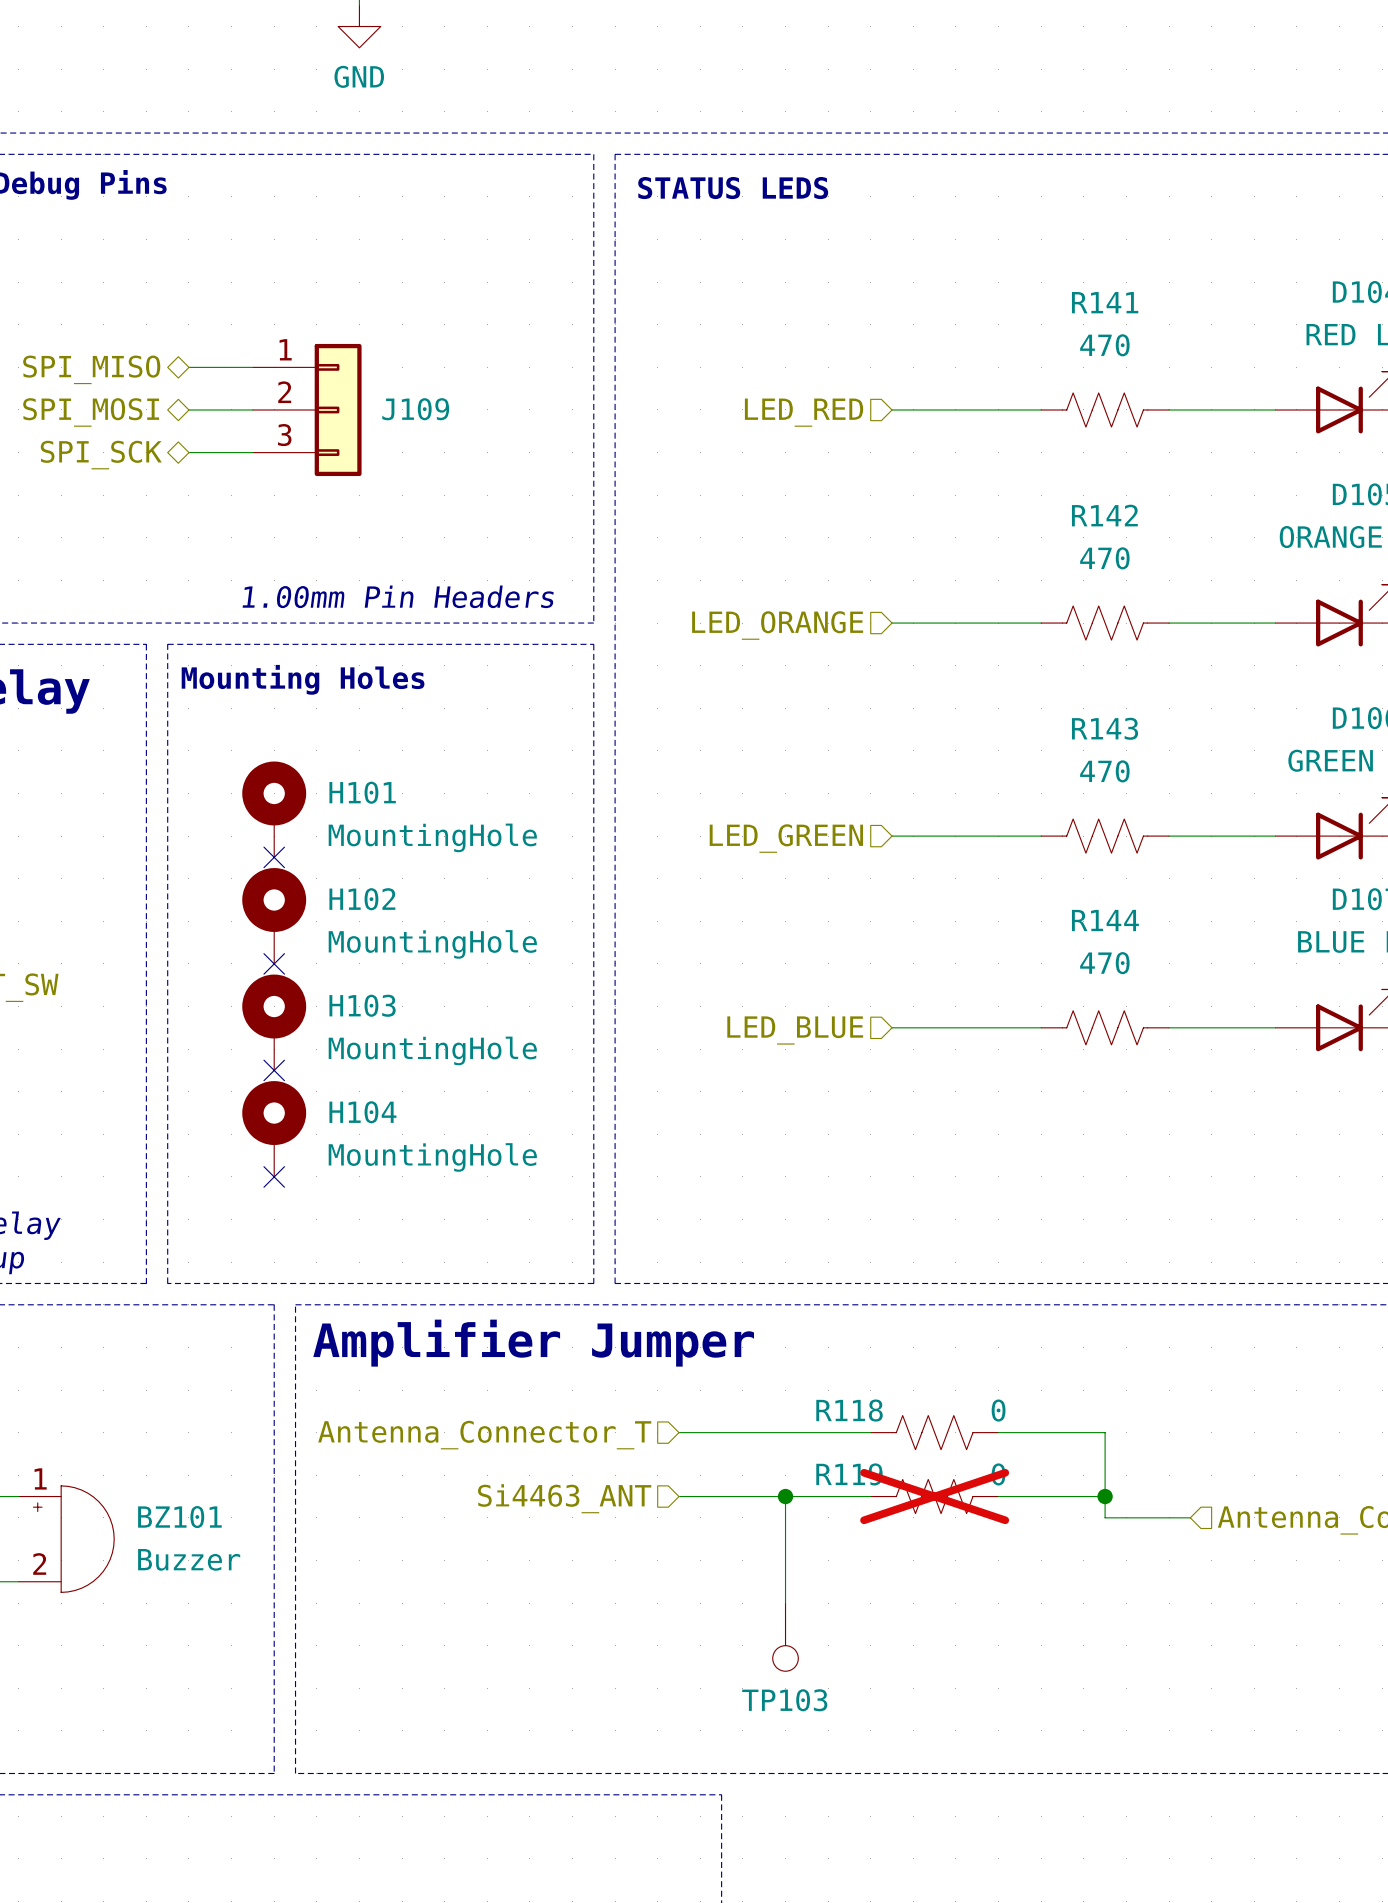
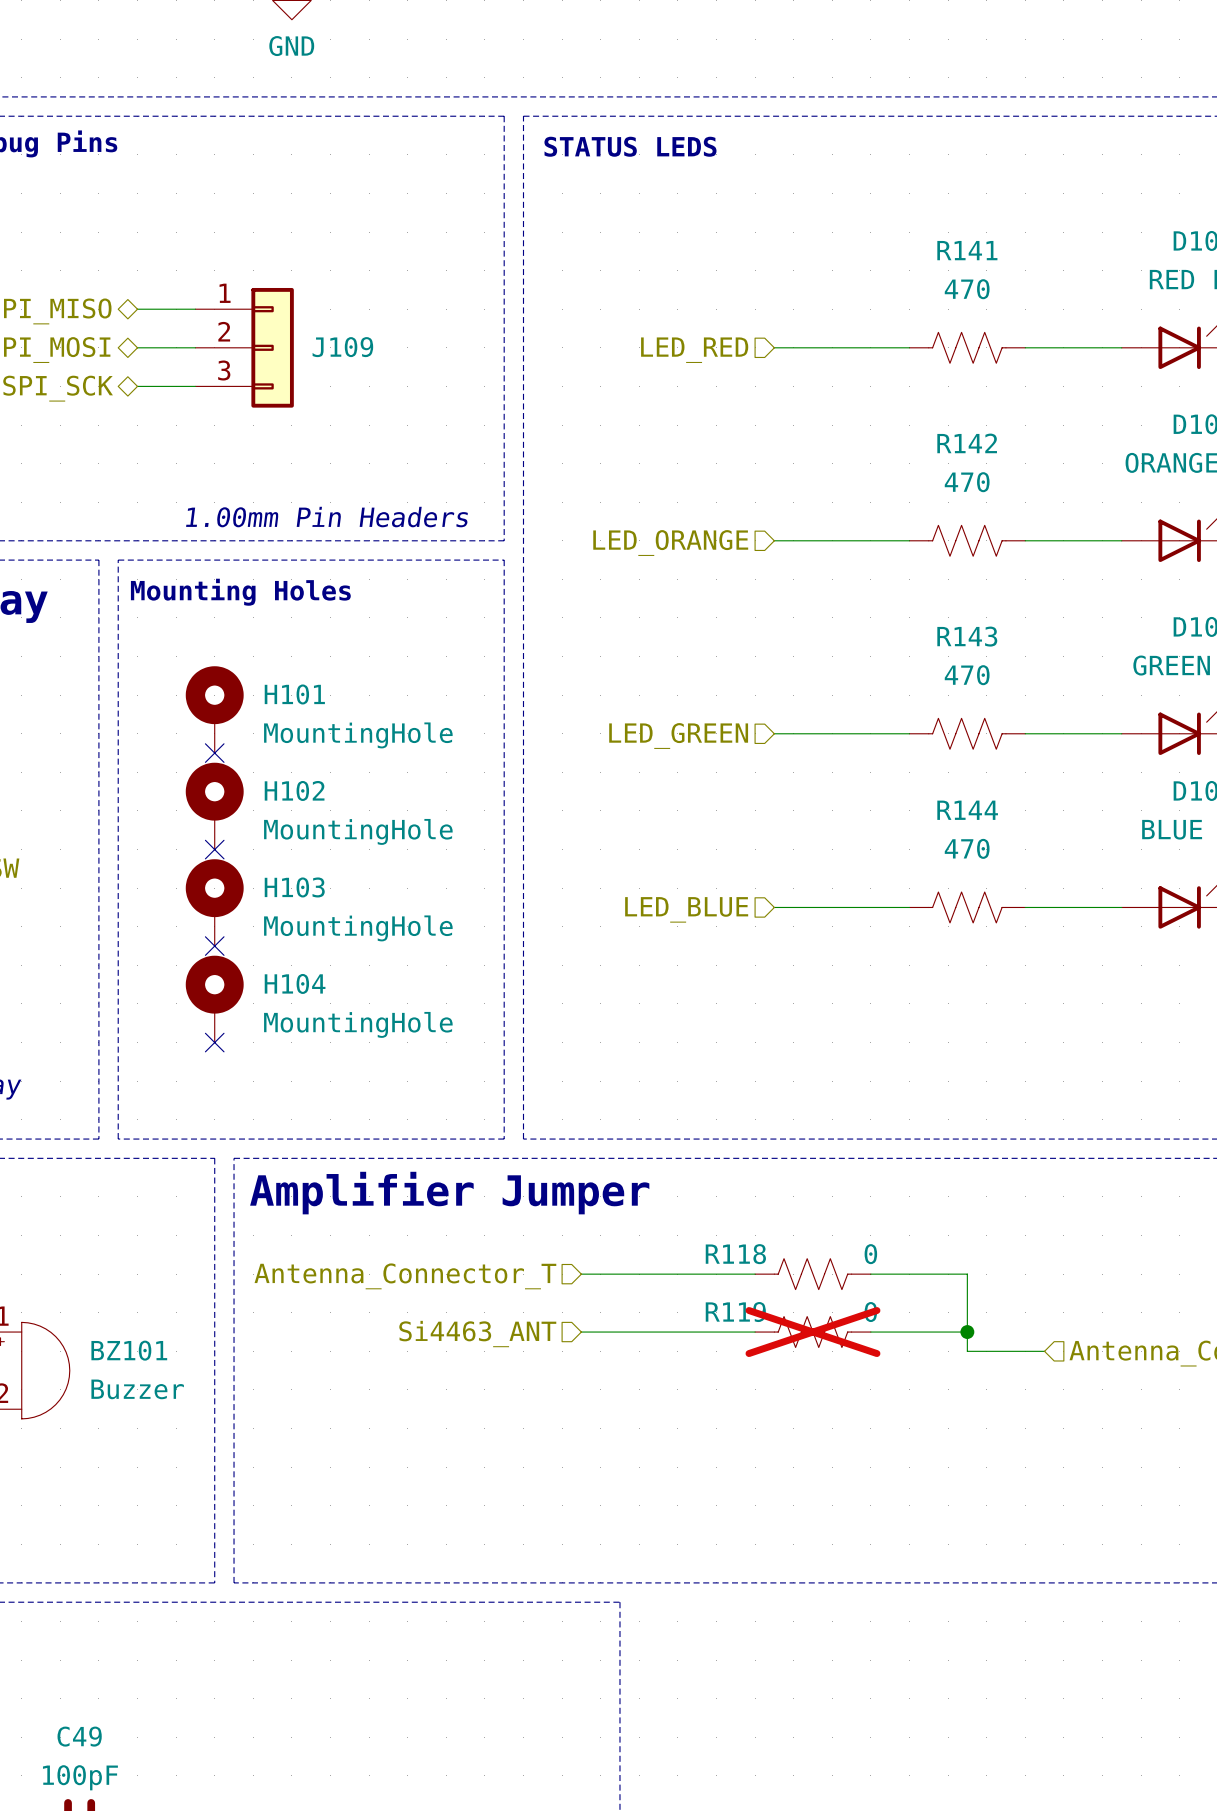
wire: (785, 1496) (785, 1603) -> none
junction: (785, 1496) -> none
TP103: (785, 1637) -> none

